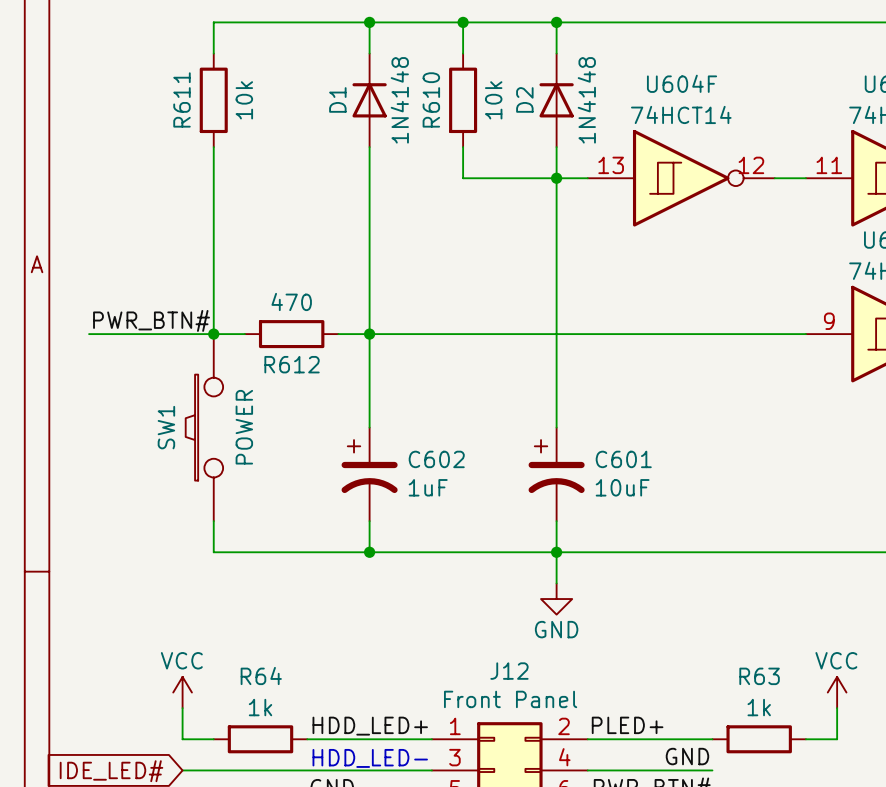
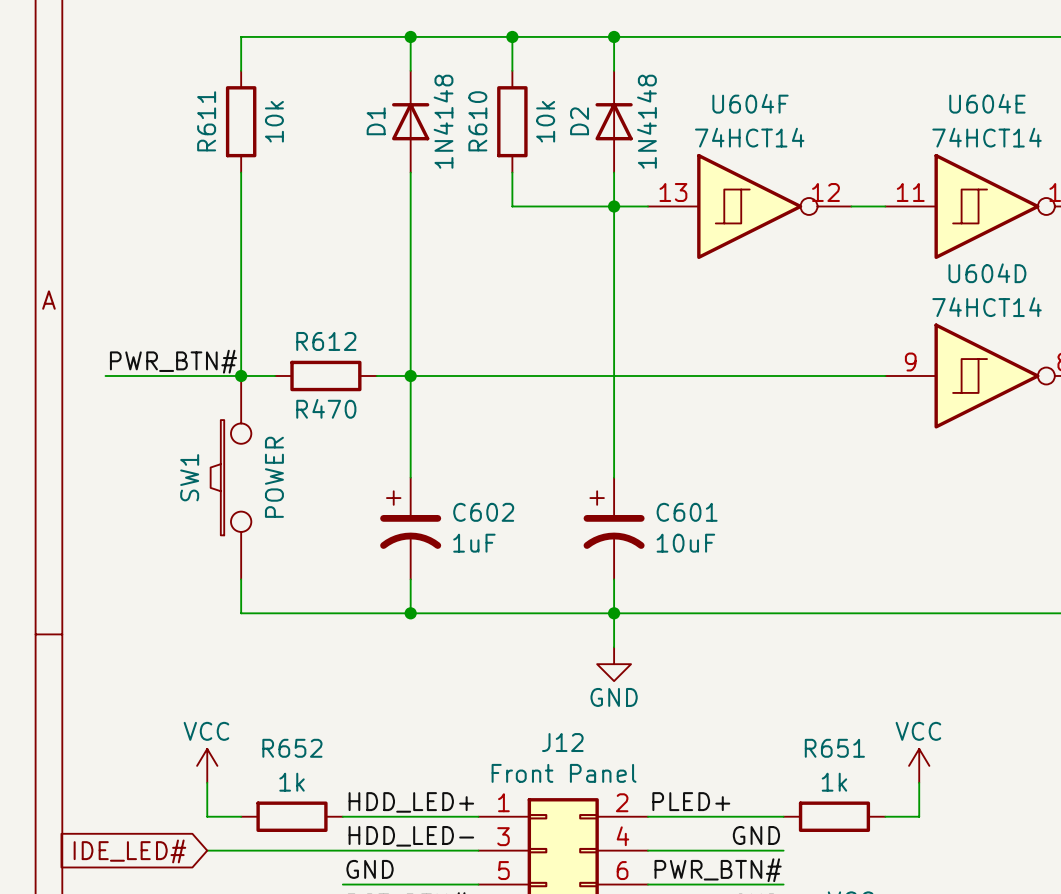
R612 value: 470 (291, 301) -> R612 (326, 341)
R612 name: R612 (292, 364) -> R470 (326, 408)
R64 name: R64 (261, 675) -> R652 (292, 748)
R63 name: R63 (759, 676) -> R651 (834, 748)
label: none -> HDD_LED- (411, 836)
text: HDD_LED- (370, 758) -> none

